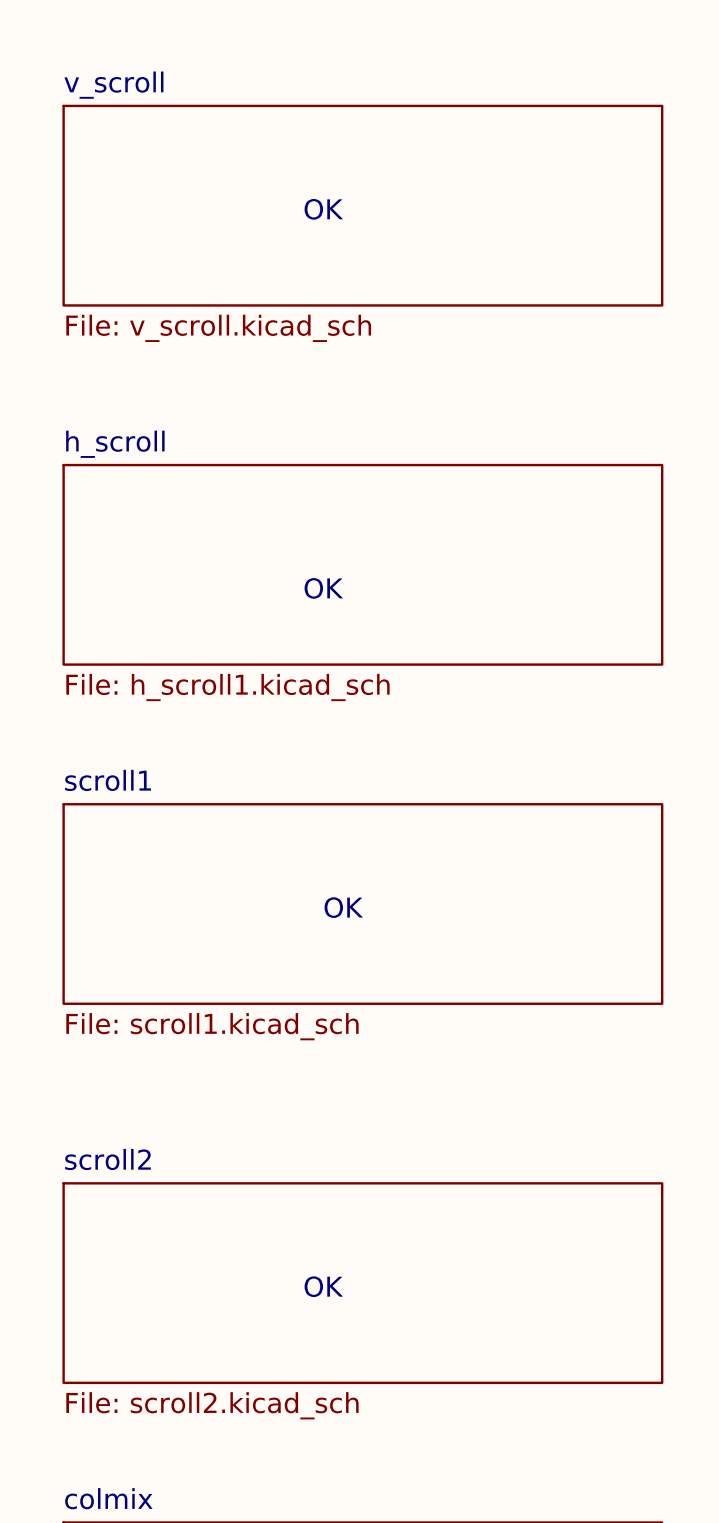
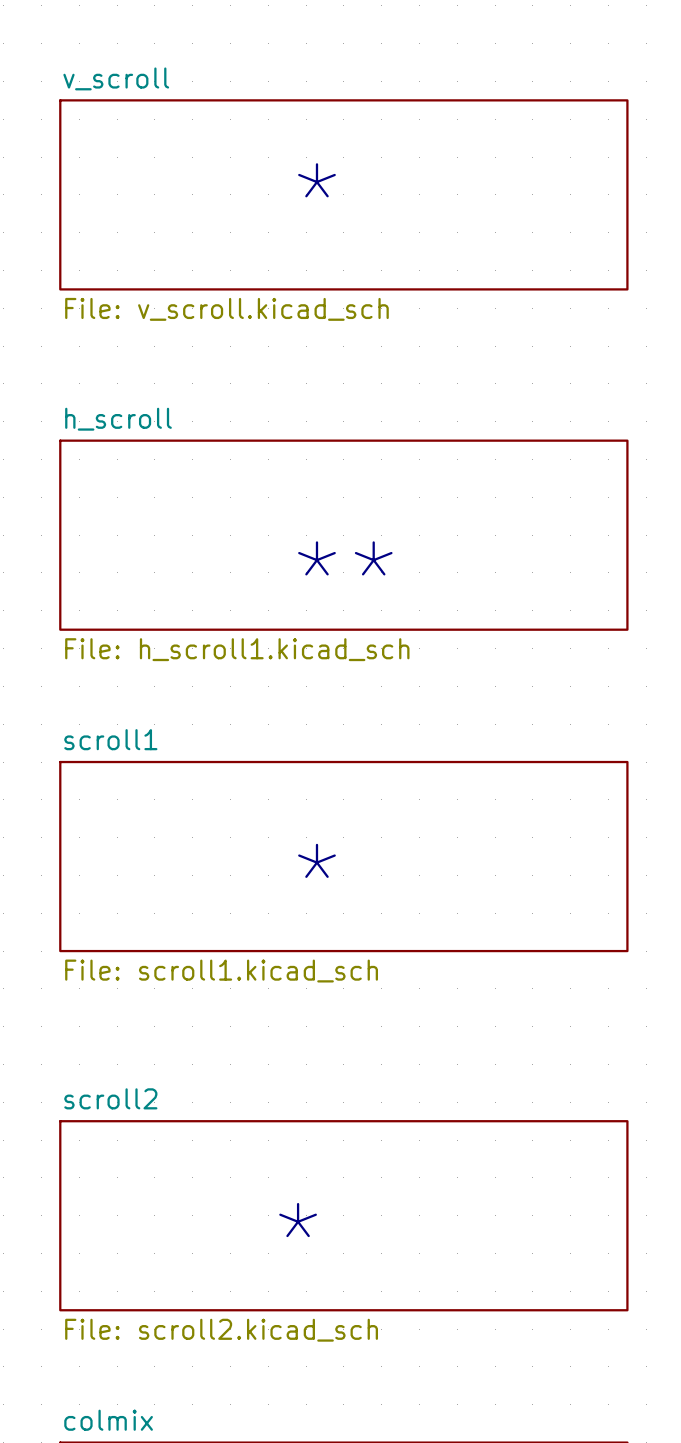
text: none -> * (316, 180)
text: OK (323, 209) -> none
text: OK (323, 588) -> none
text: none -> * (316, 558)
text: none -> * (373, 558)
text: OK (343, 907) -> none
text: none -> * (316, 860)
text: OK (323, 1286) -> none
text: none -> * (298, 1220)

